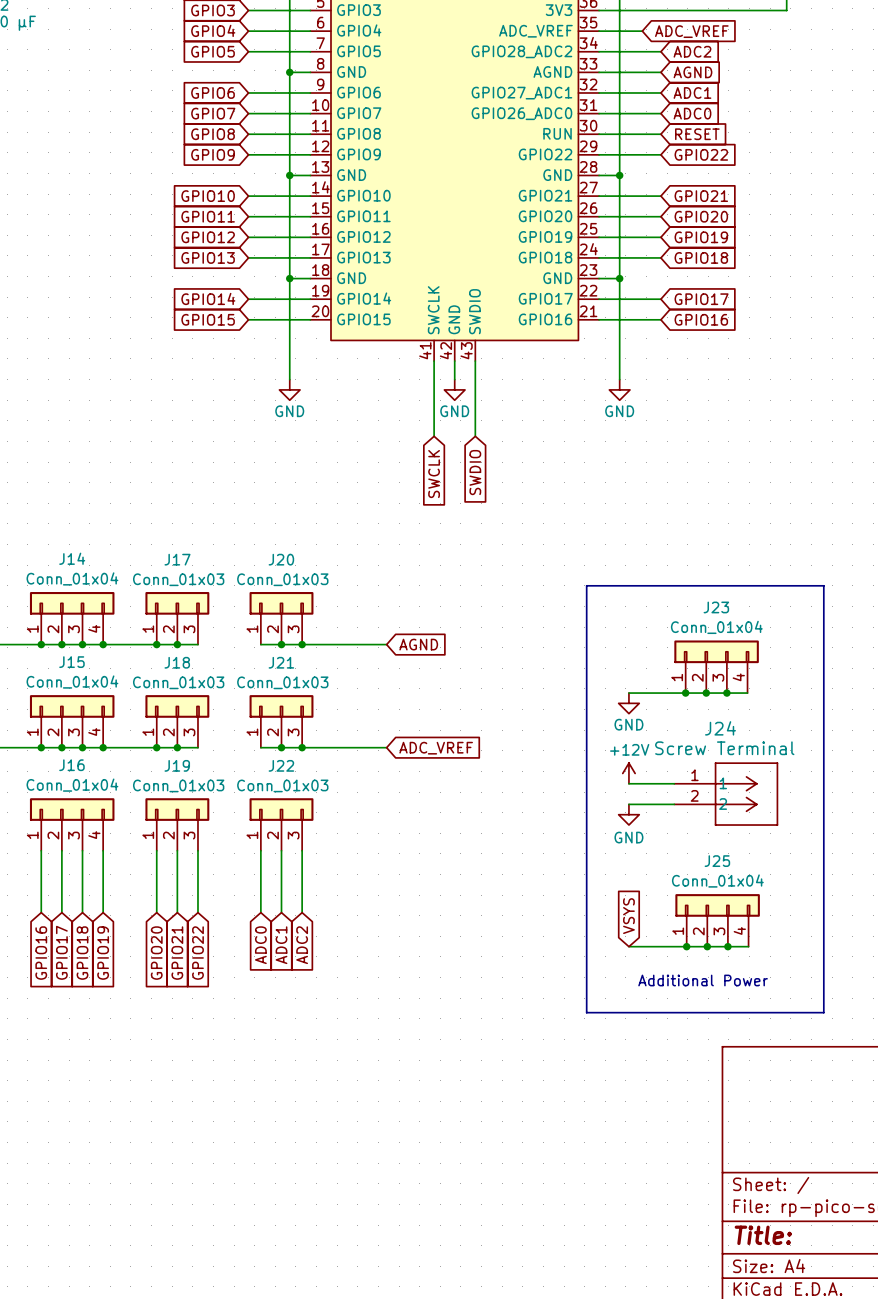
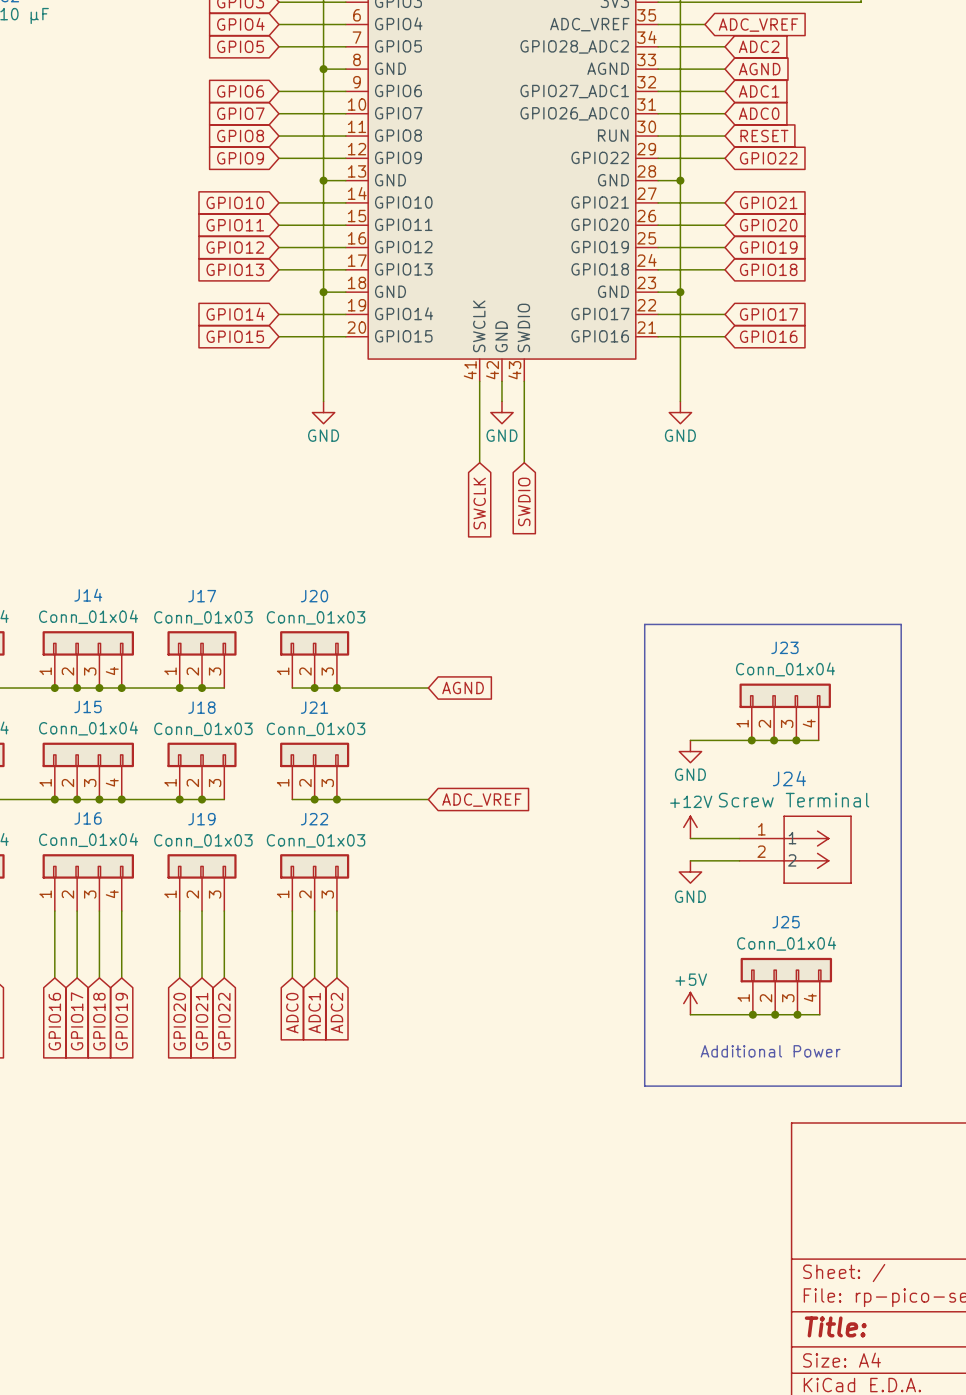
global label: VSYS (628, 916) -> none
power symbol: none -> +5V (690, 1003)

